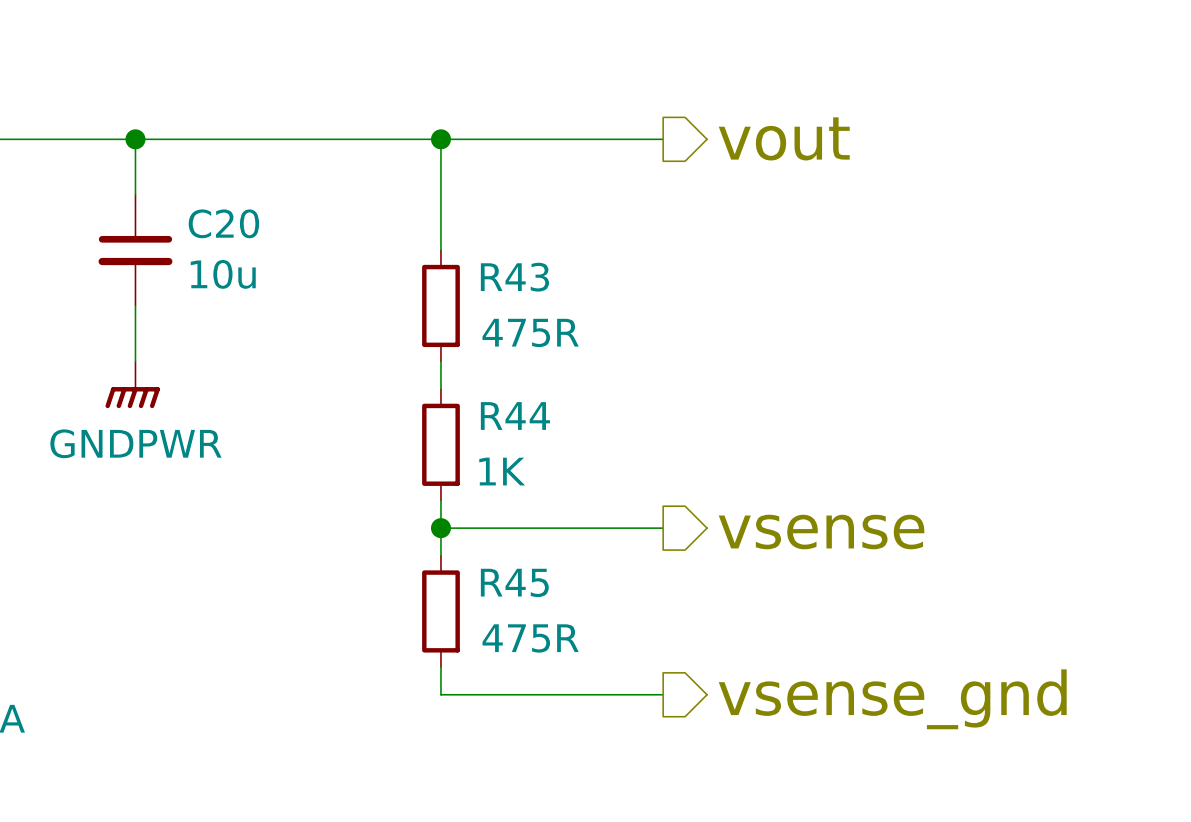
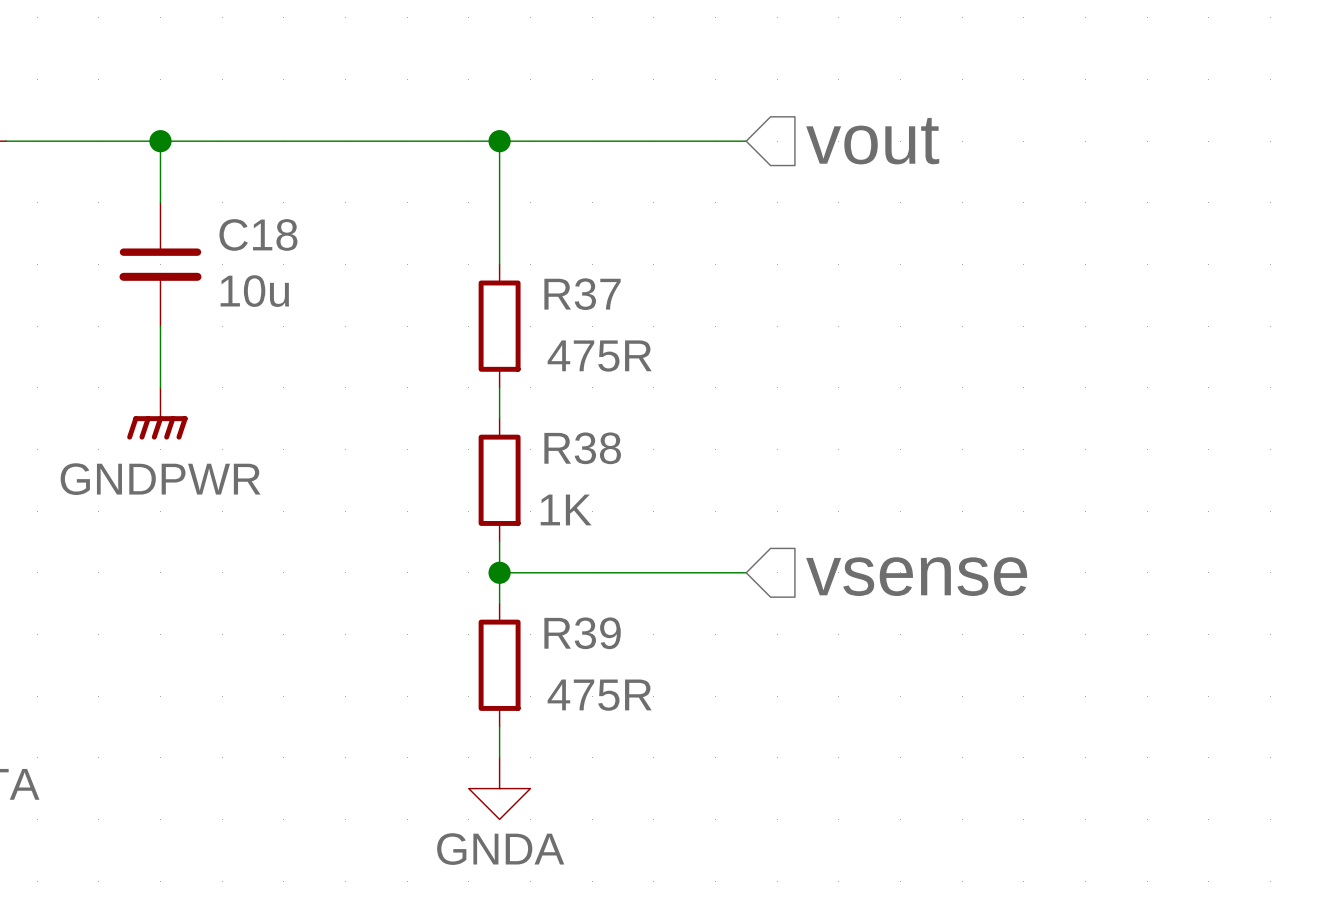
hierarchical label shape: output (784, 138) -> input (872, 141)
C20 name: C20 (223, 223) -> C18 (258, 234)
R43 name: R43 (514, 277) -> R37 (582, 294)
R44 name: R44 (515, 416) -> R38 (582, 448)
hierarchical label shape: output (821, 532) -> input (916, 576)
R45 name: R45 (514, 582) -> R39 (582, 633)
wire: (440, 694) (663, 694) -> none
hierarchical label: vsense_gnd (892, 699) -> none
power symbol: none -> GNDA (499, 788)

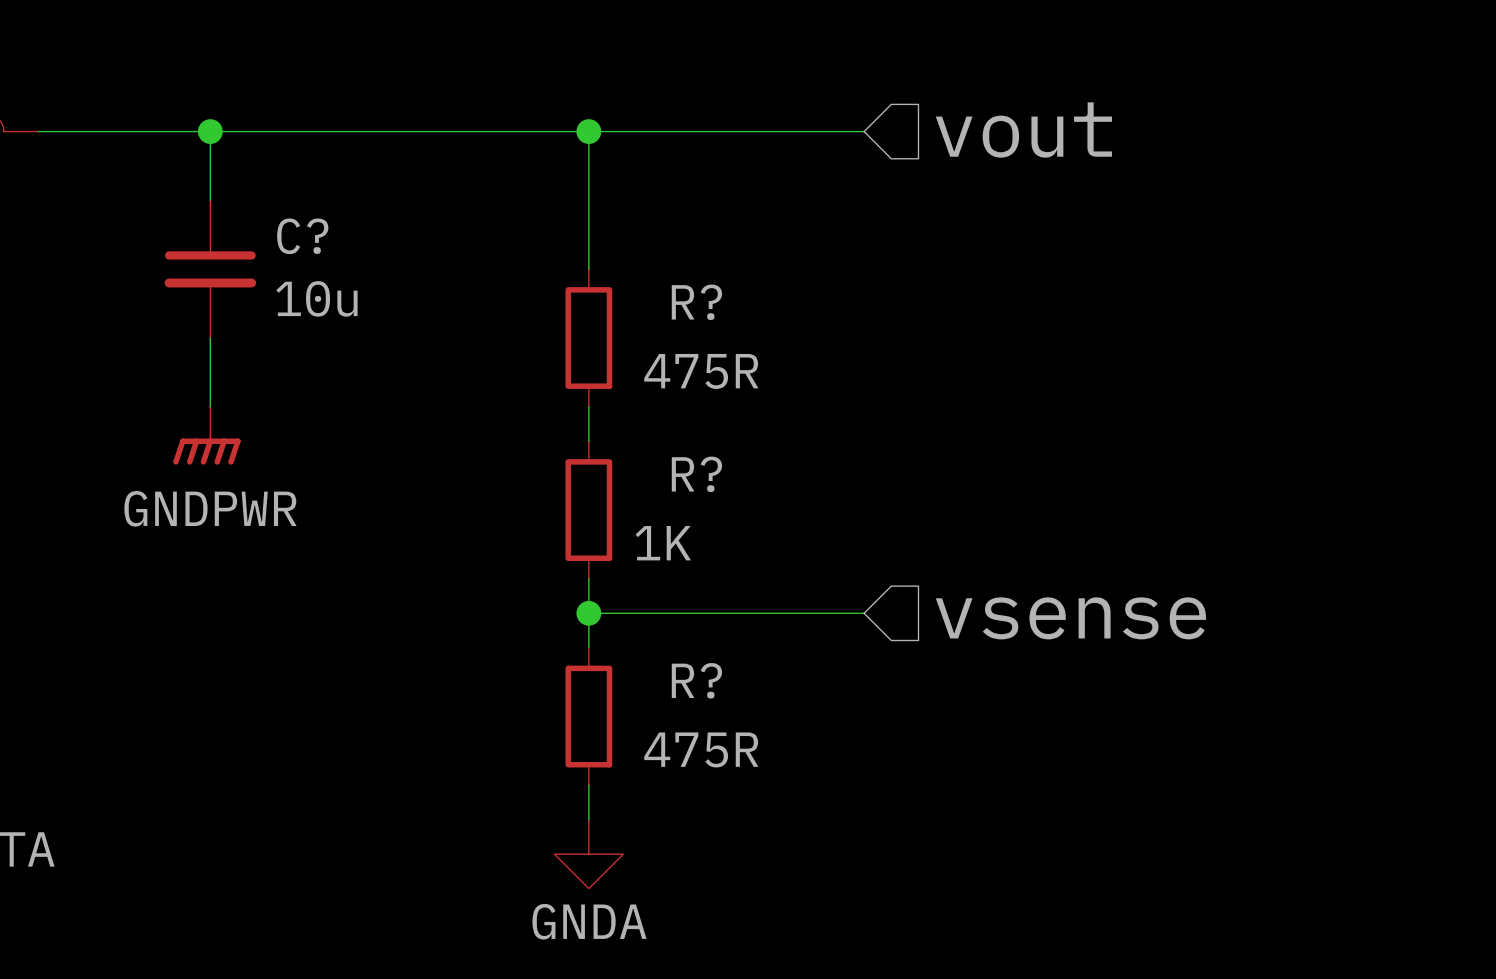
C18 name: C18 (258, 234) -> C? (302, 236)
R37 name: R37 (582, 294) -> R? (696, 302)
R38 name: R38 (582, 448) -> R? (696, 474)
R39 name: R39 (582, 633) -> R? (696, 680)

